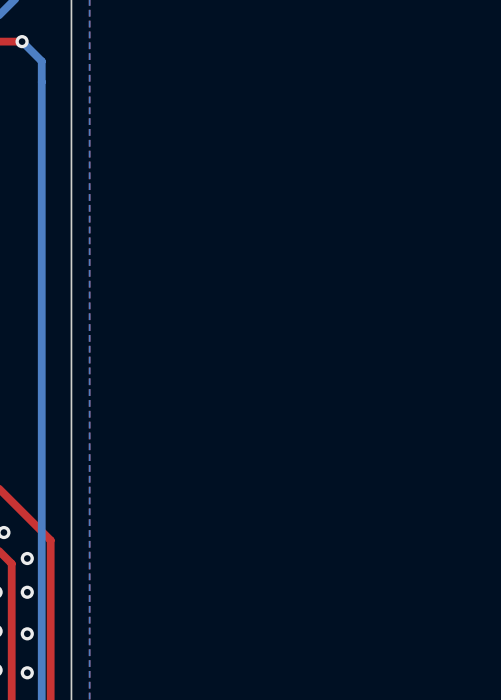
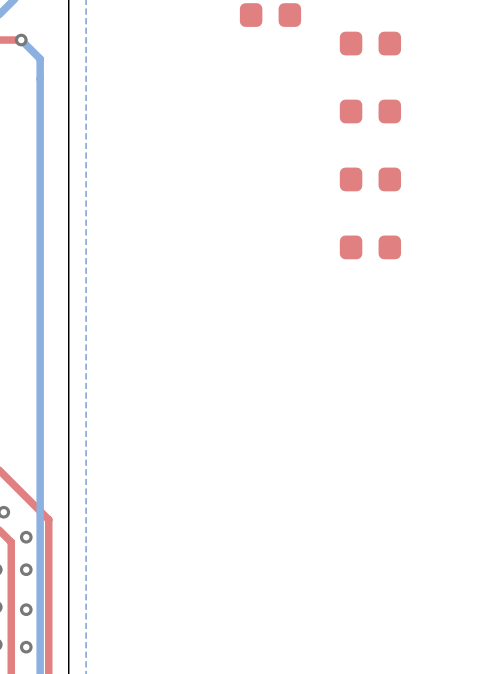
part: none -> (270, 15)
part: none -> (370, 43)
part: none -> (370, 111)
part: none -> (370, 179)
part: none -> (370, 247)

